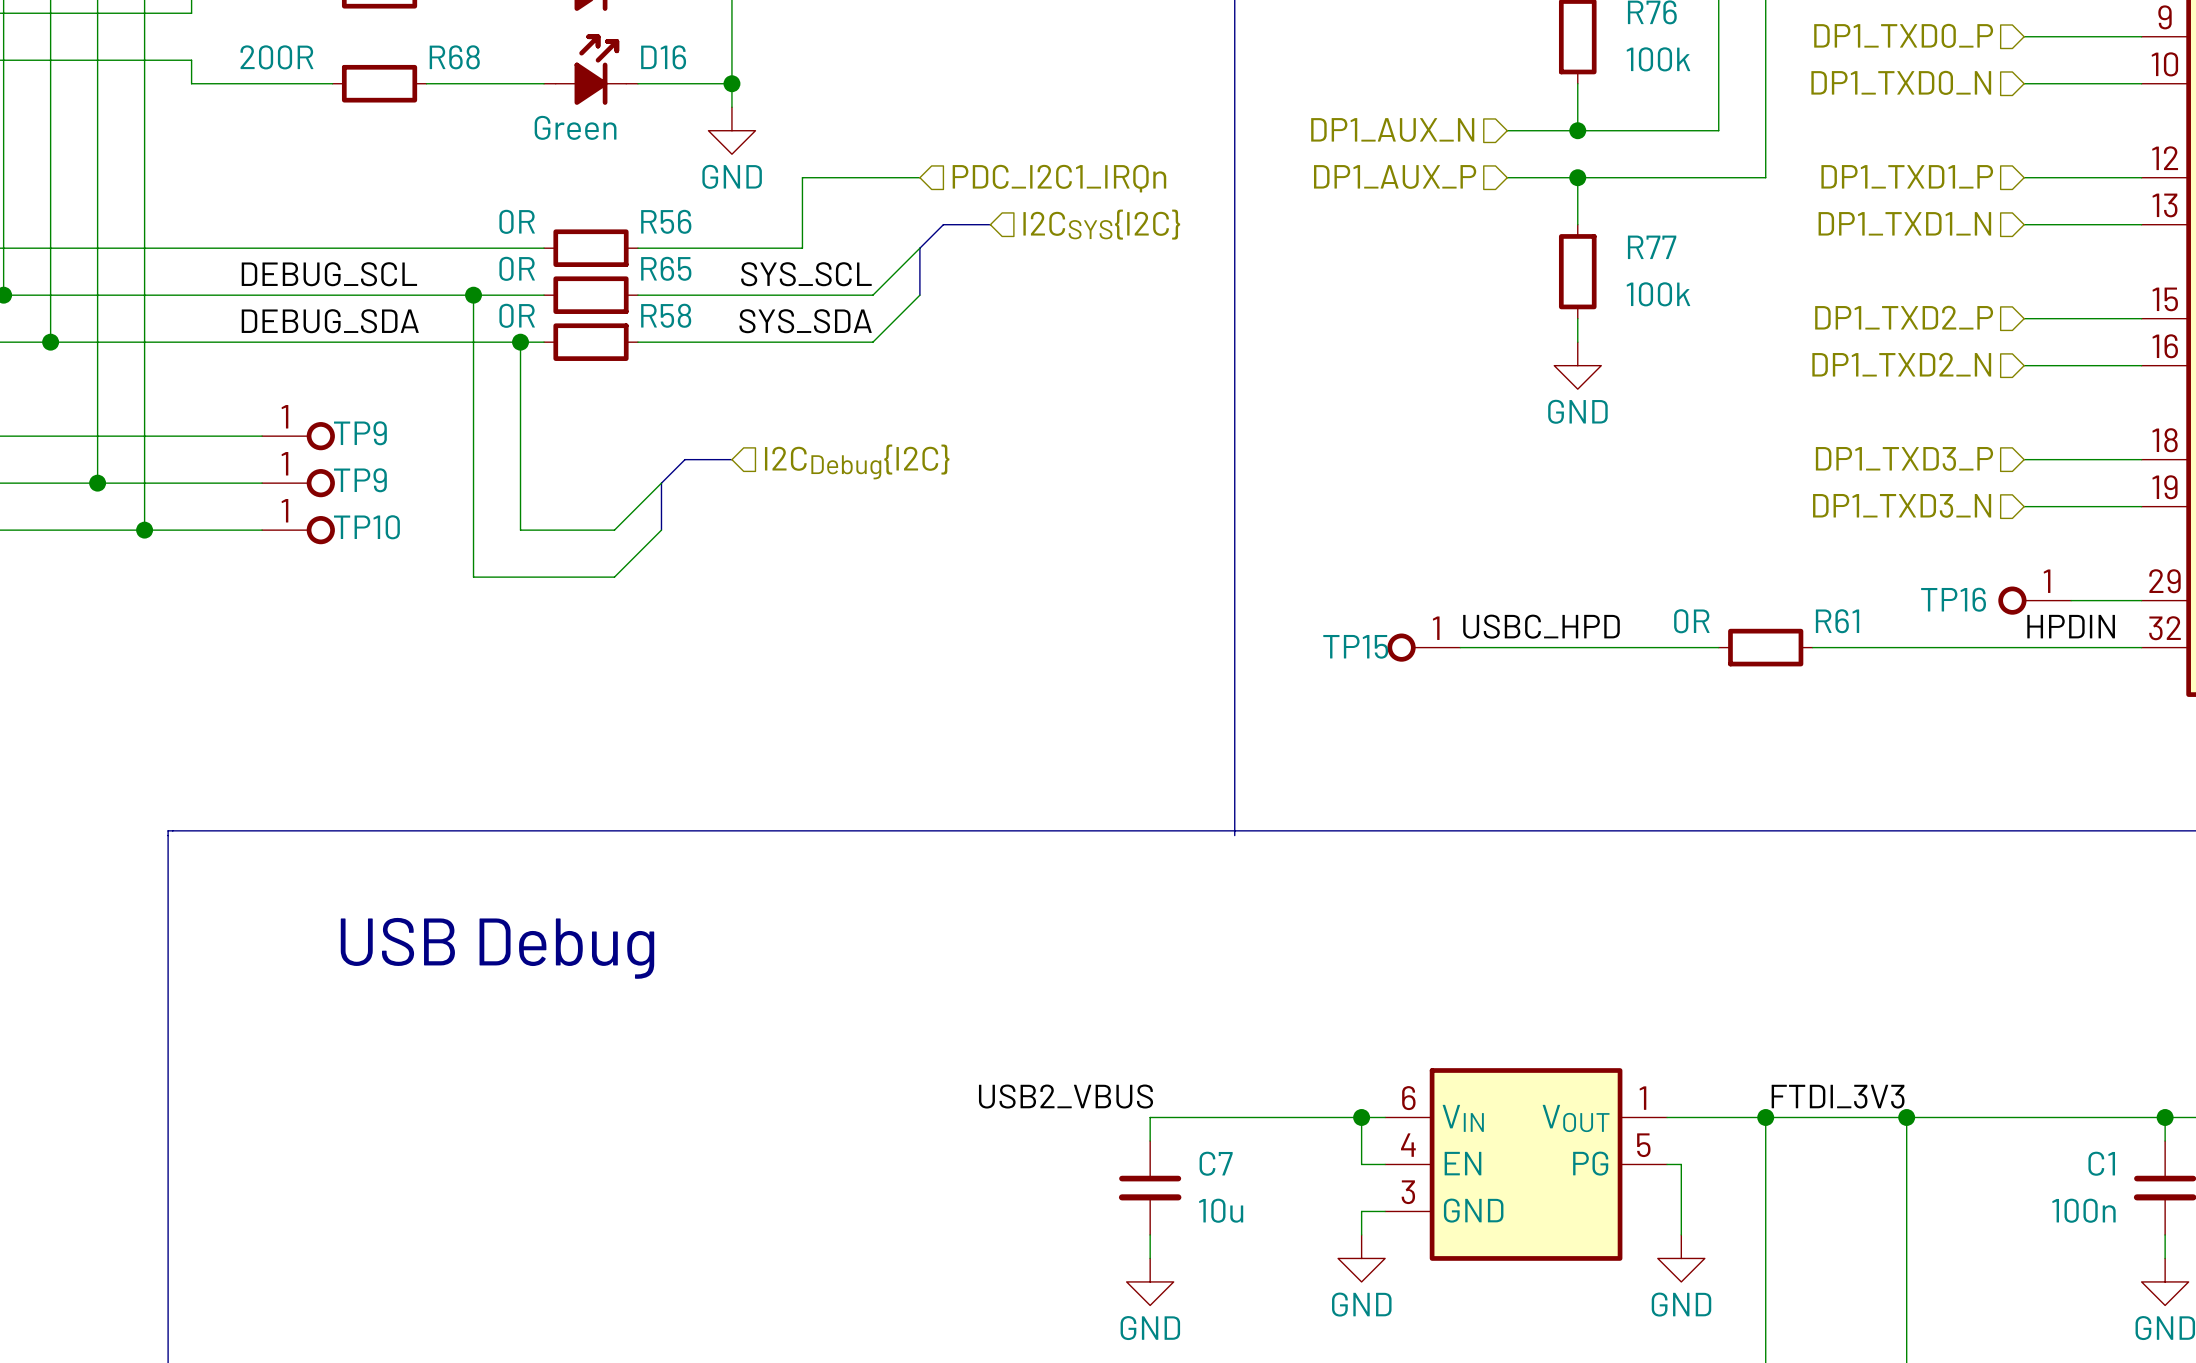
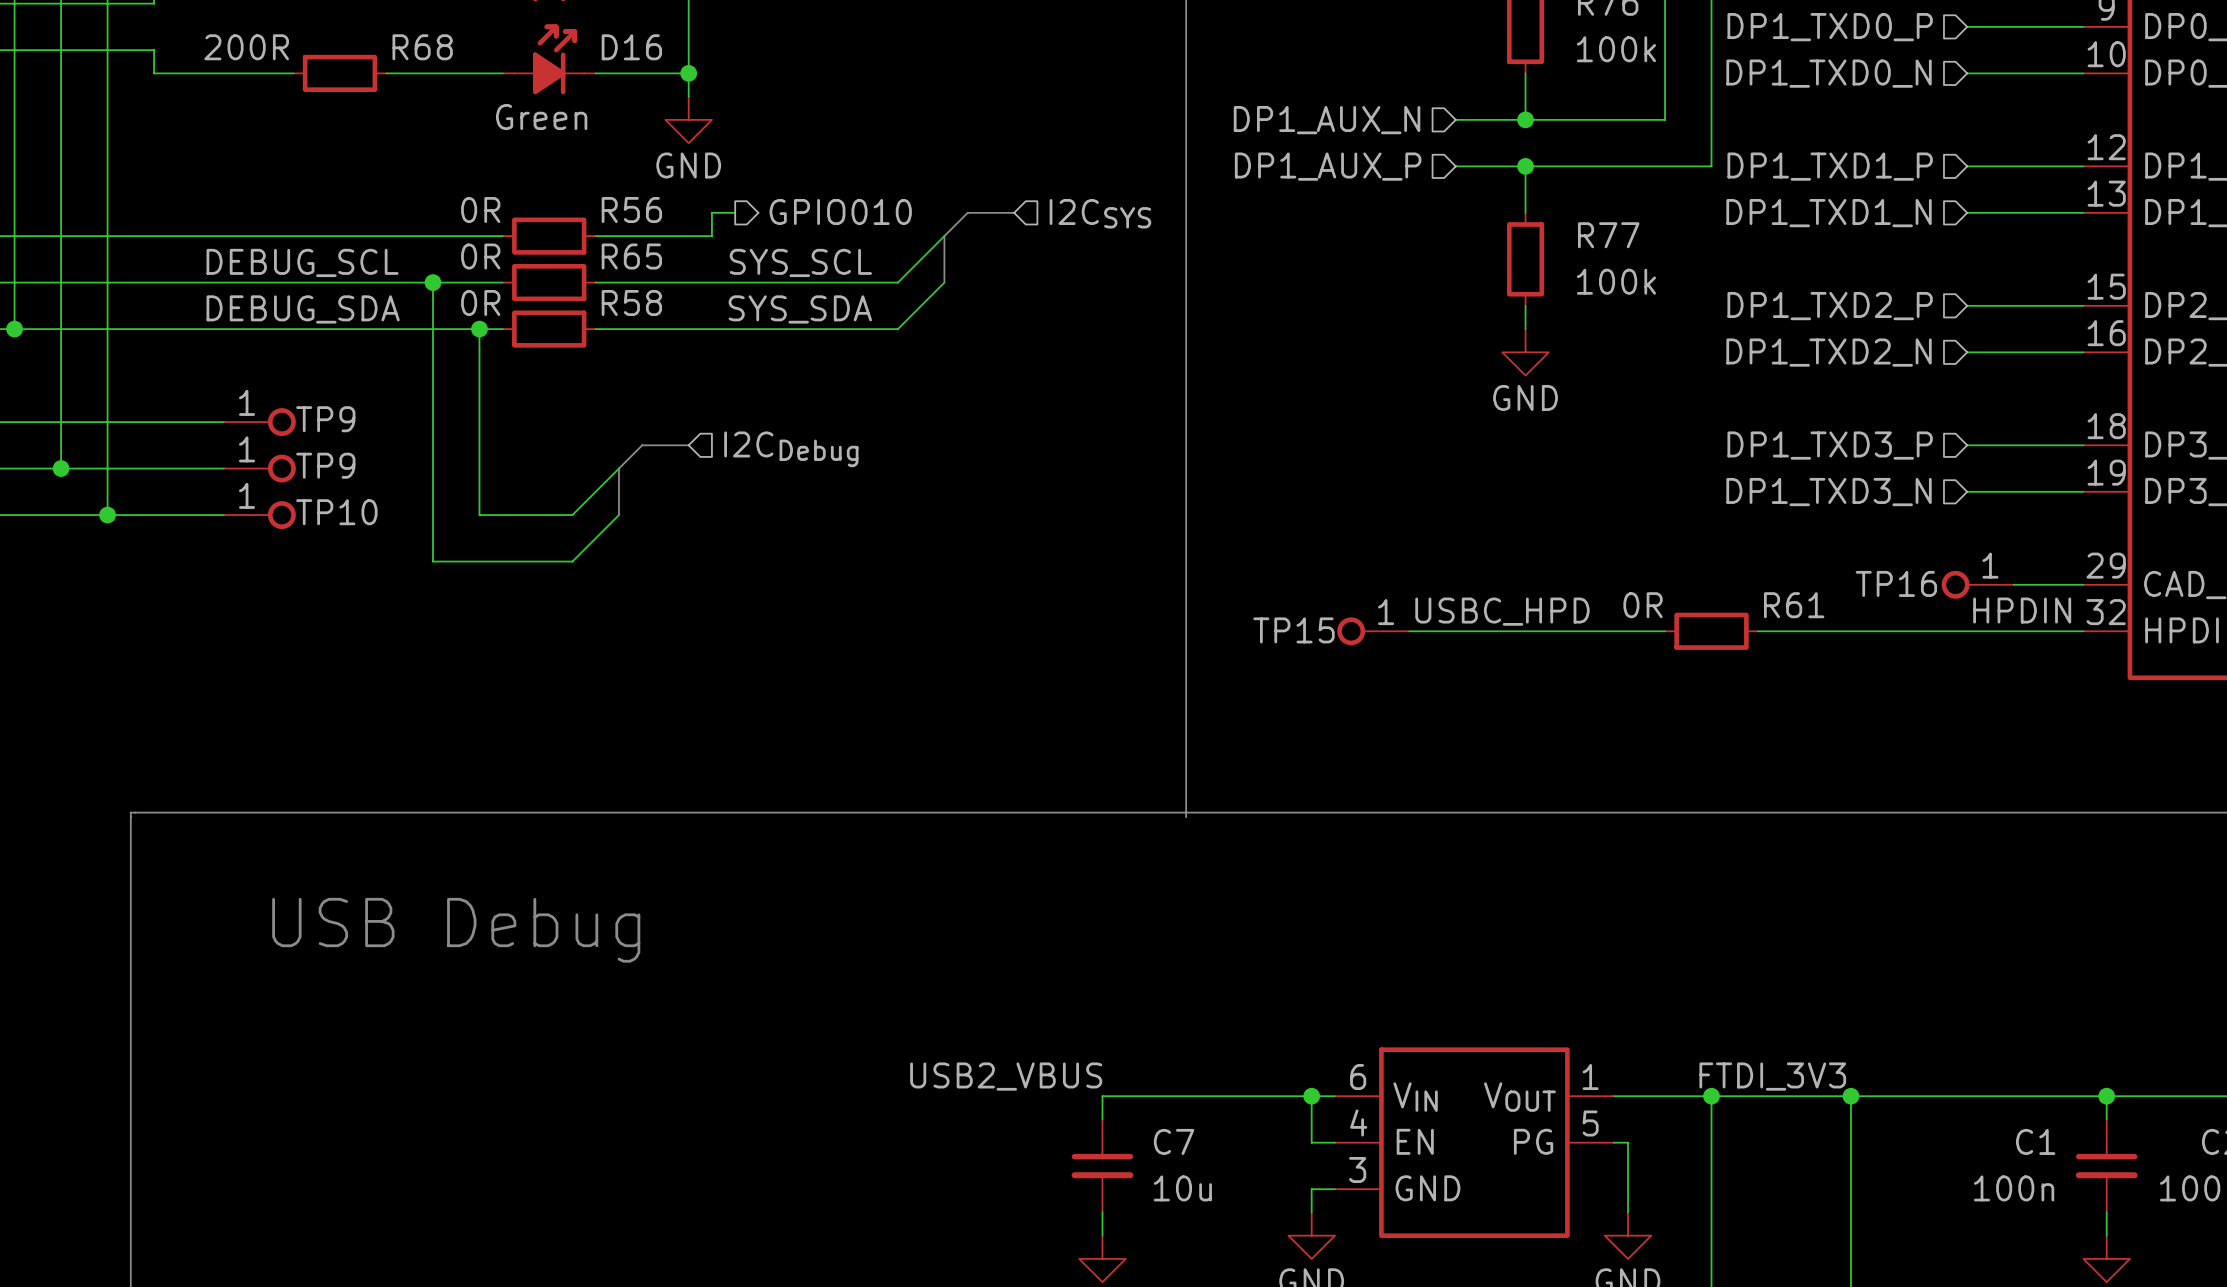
wire: (919, 177) (802, 177) (802, 248) (755, 248) -> (735, 212) (711, 212) (711, 236)
hierarchical label: PDC_I2C1_IRQn (1059, 178) -> none
hierarchical label: none -> GPIO010 (840, 211)
bus: (990, 224) (943, 224) (919, 248) (919, 295) -> (1014, 212) (967, 212) (944, 236) (944, 282)
hierarchical label: I2CSYS{I2C} (1101, 224) -> I2CSYS (1100, 213)
wire: (919, 248) (872, 295) -> (944, 236) (897, 282) (828, 282)
label position: SYS_SCL (806, 274) -> SYS_SCL (800, 262)
wire: (919, 295) (872, 342) -> (944, 282) (897, 329) (828, 329)
label position: SYS_SDA (805, 321) -> SYS_SDA (800, 309)
hierarchical label: I2CDebug{I2C} (857, 461) -> I2CDebug (791, 449)

